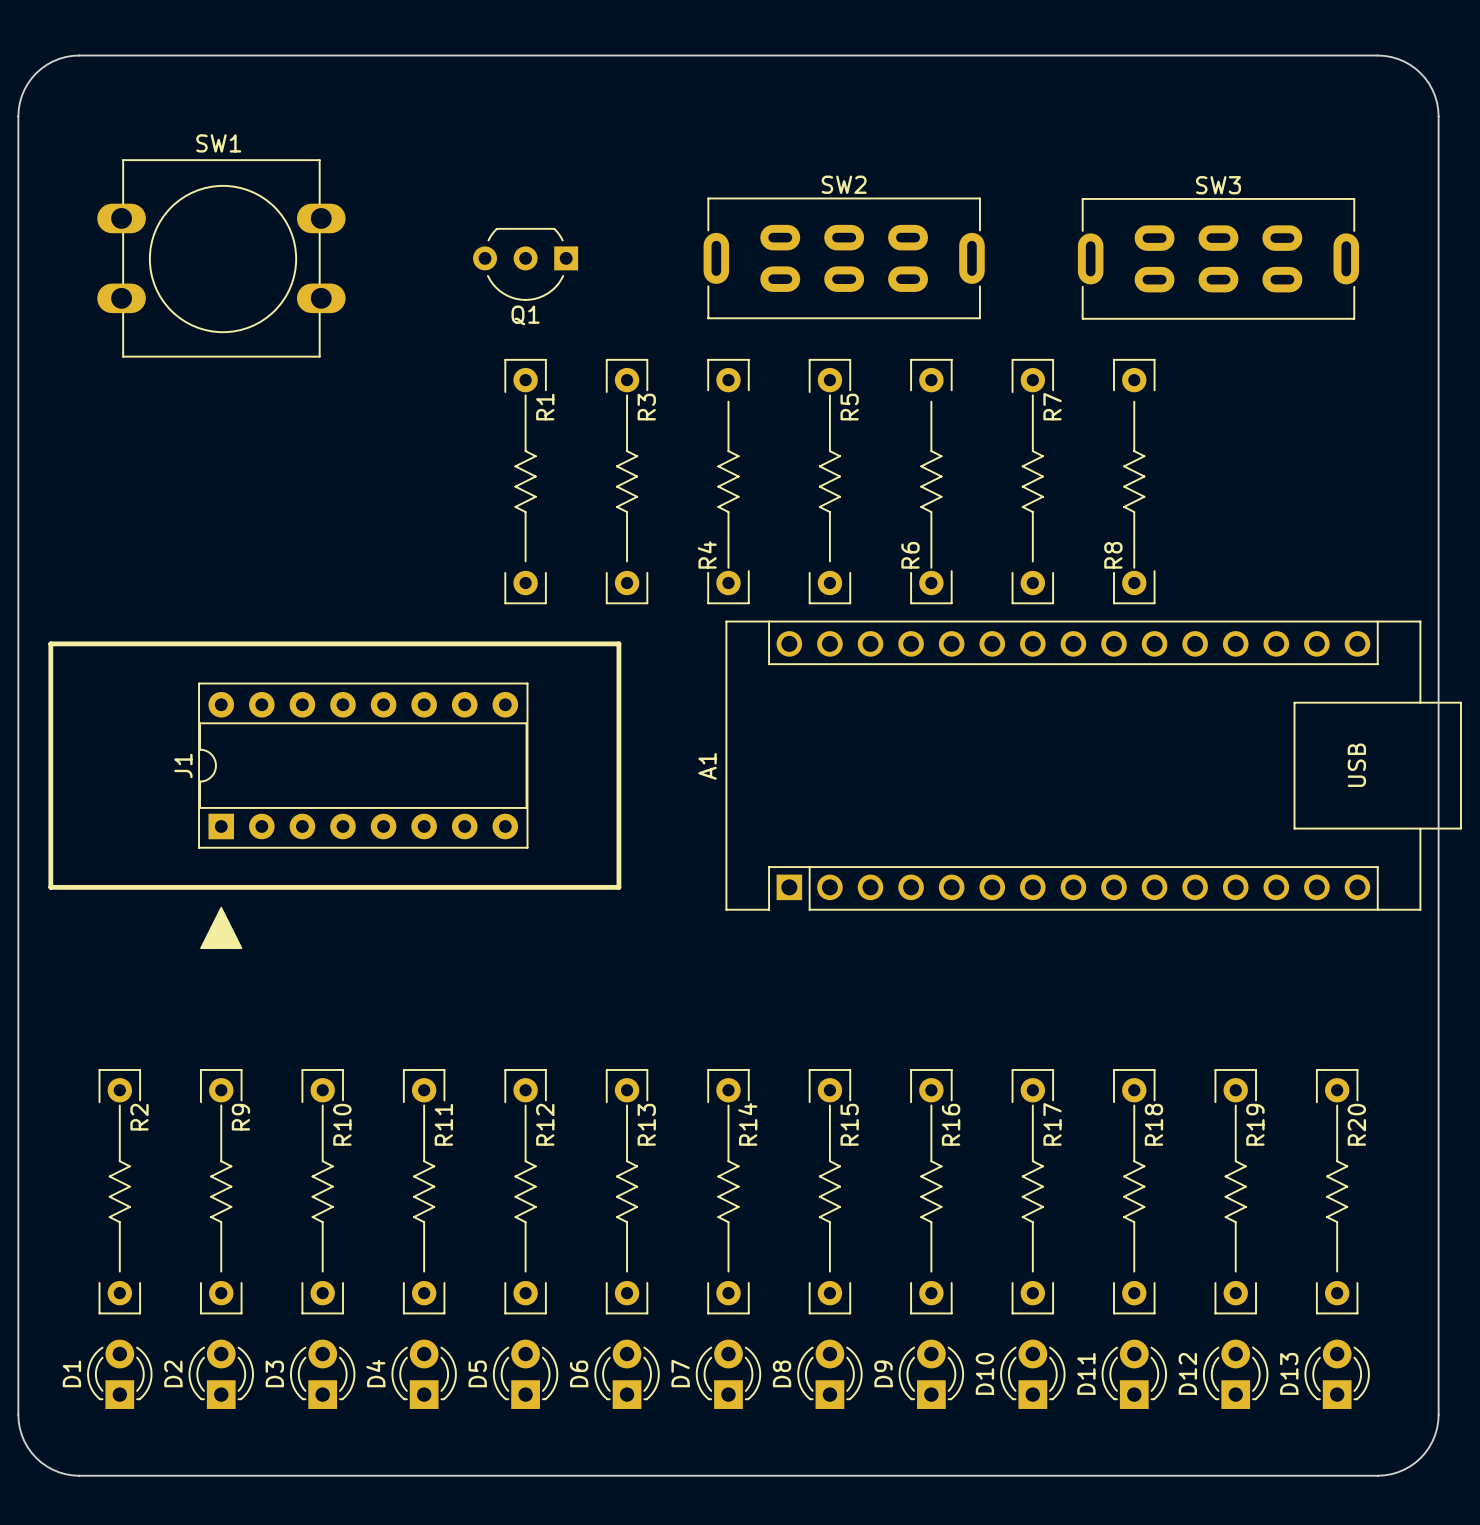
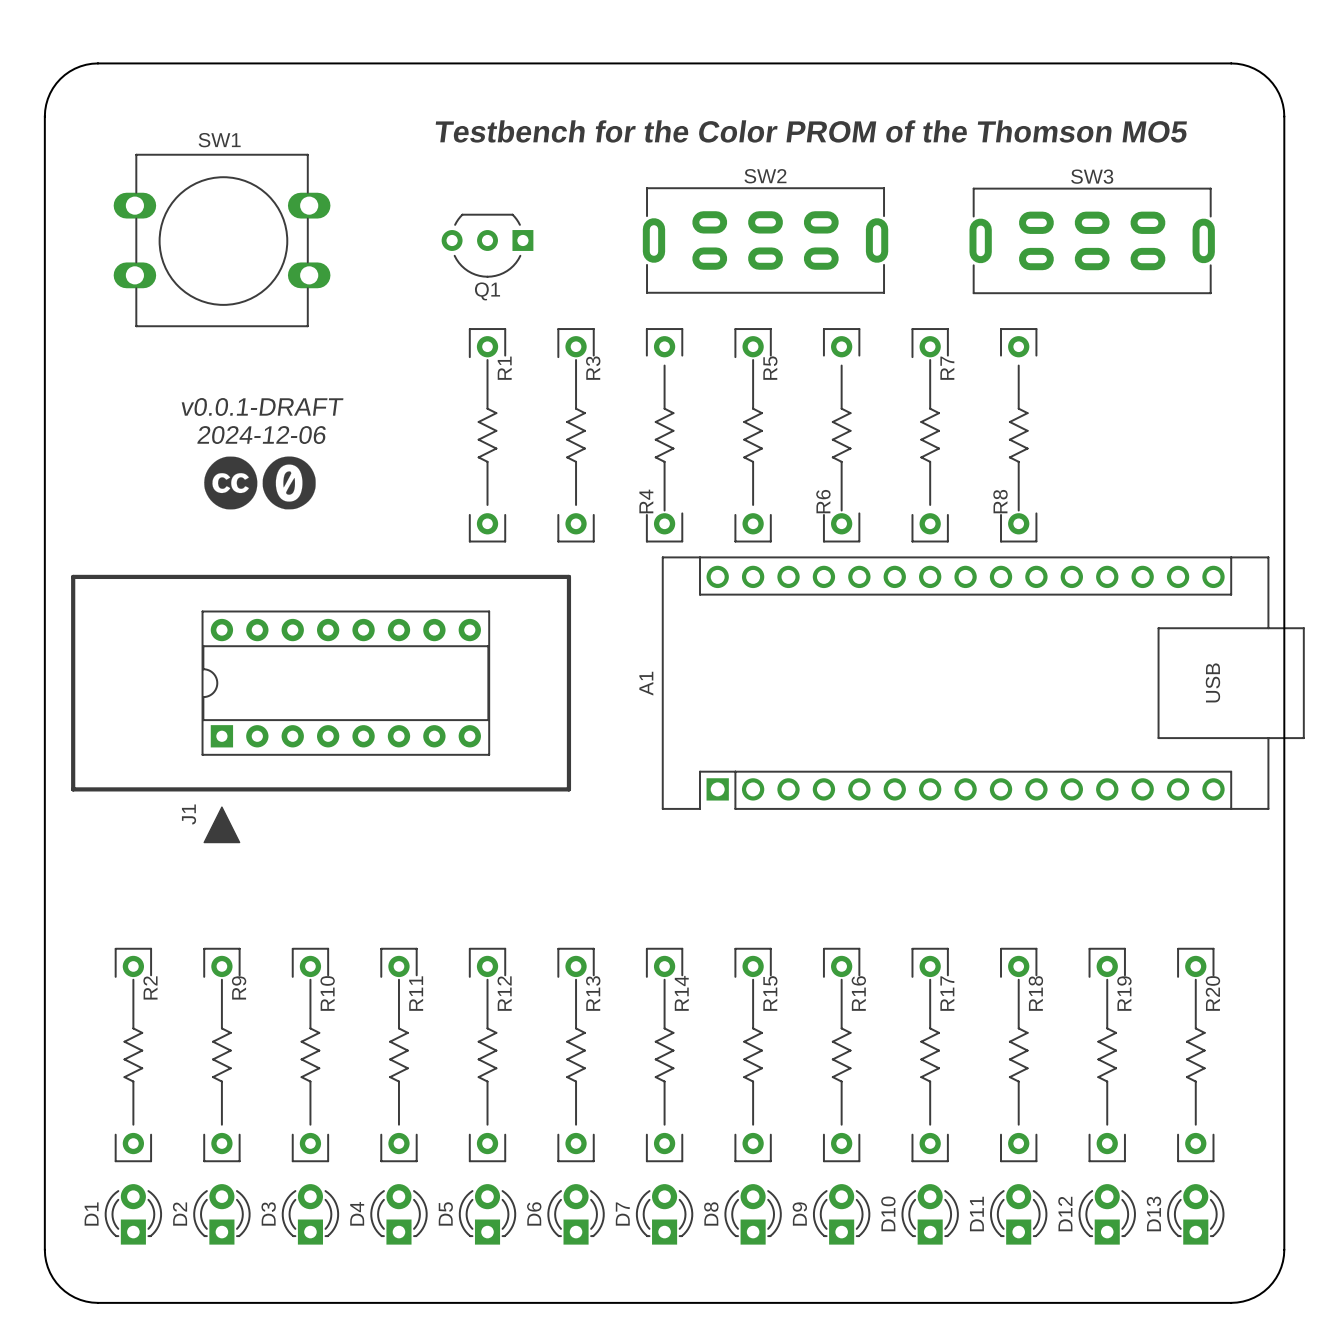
text: none -> Testbench for the Color PROM of the Thomson MO5 (811, 131)
text: none -> v0.0.1-DRAFT (262, 406)
text: none -> 2024-12-06 (261, 435)
drawing: none -> [204, 456, 316, 510]
J1 name position: J1 (183, 766) -> J1 (189, 814)

